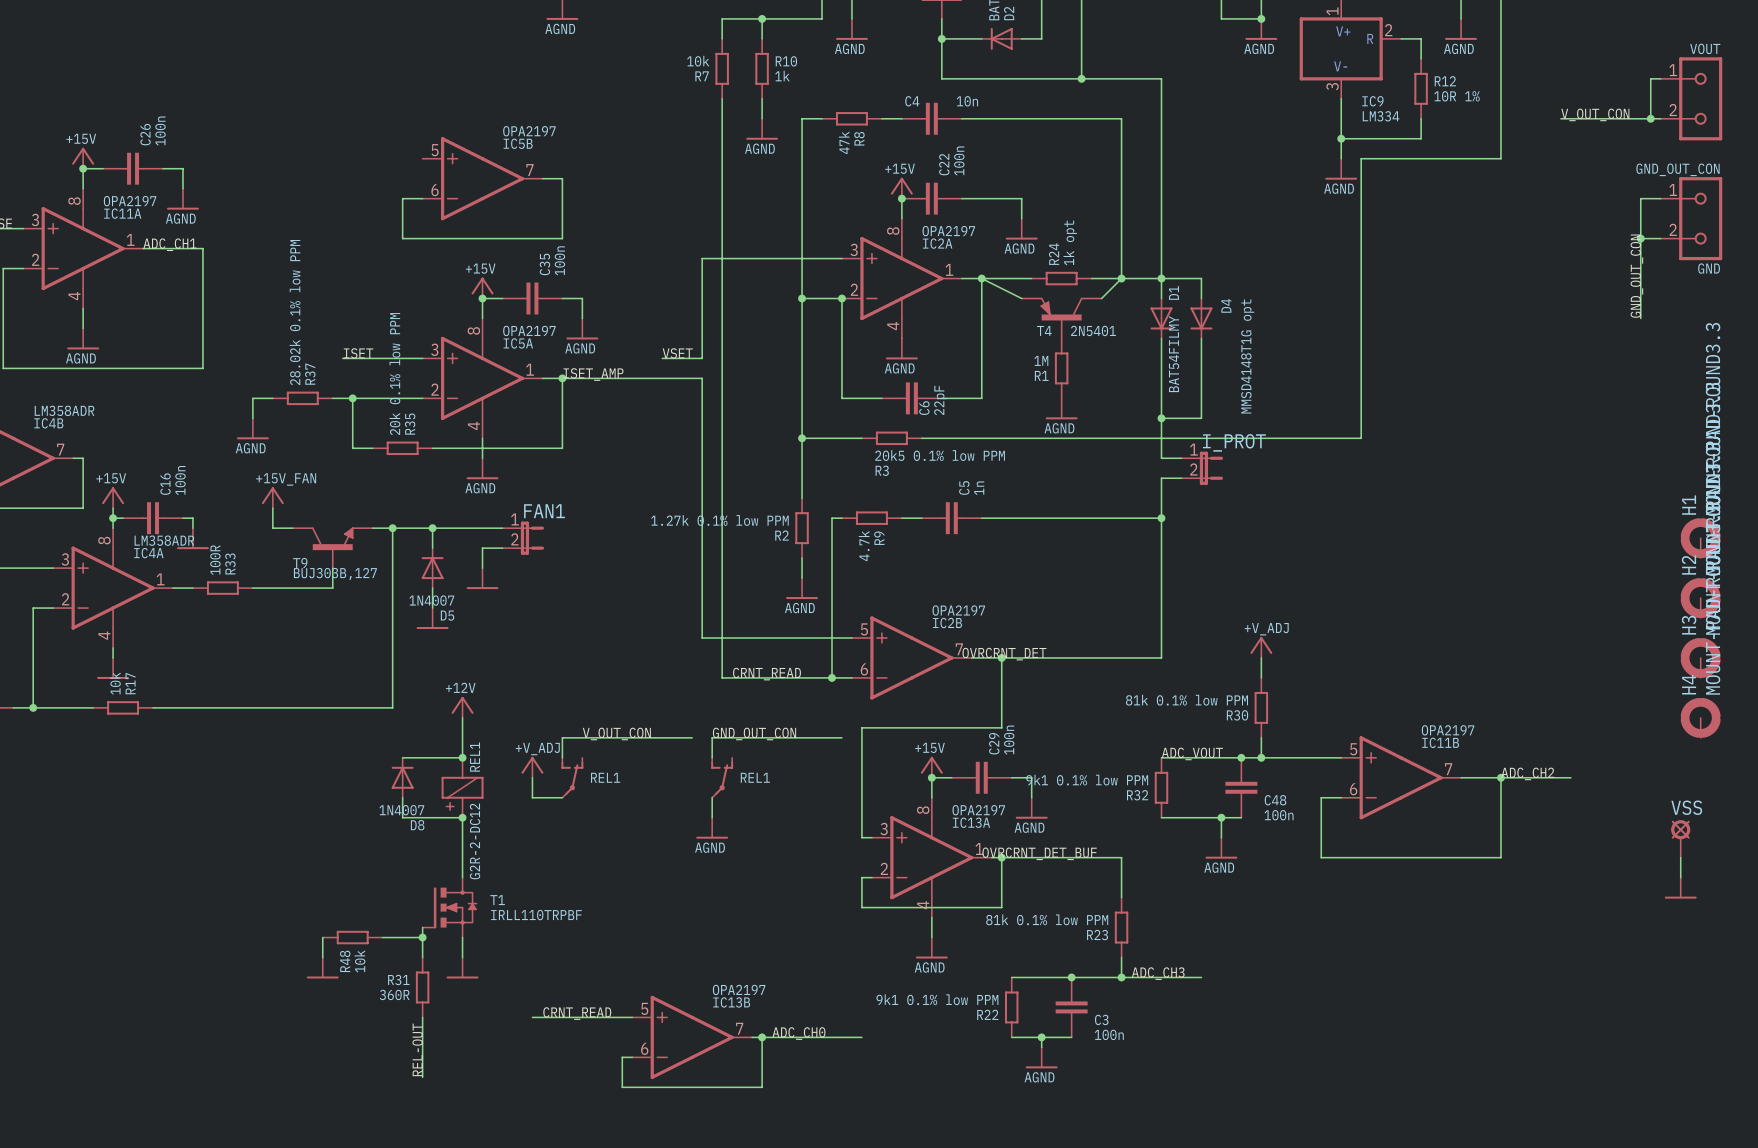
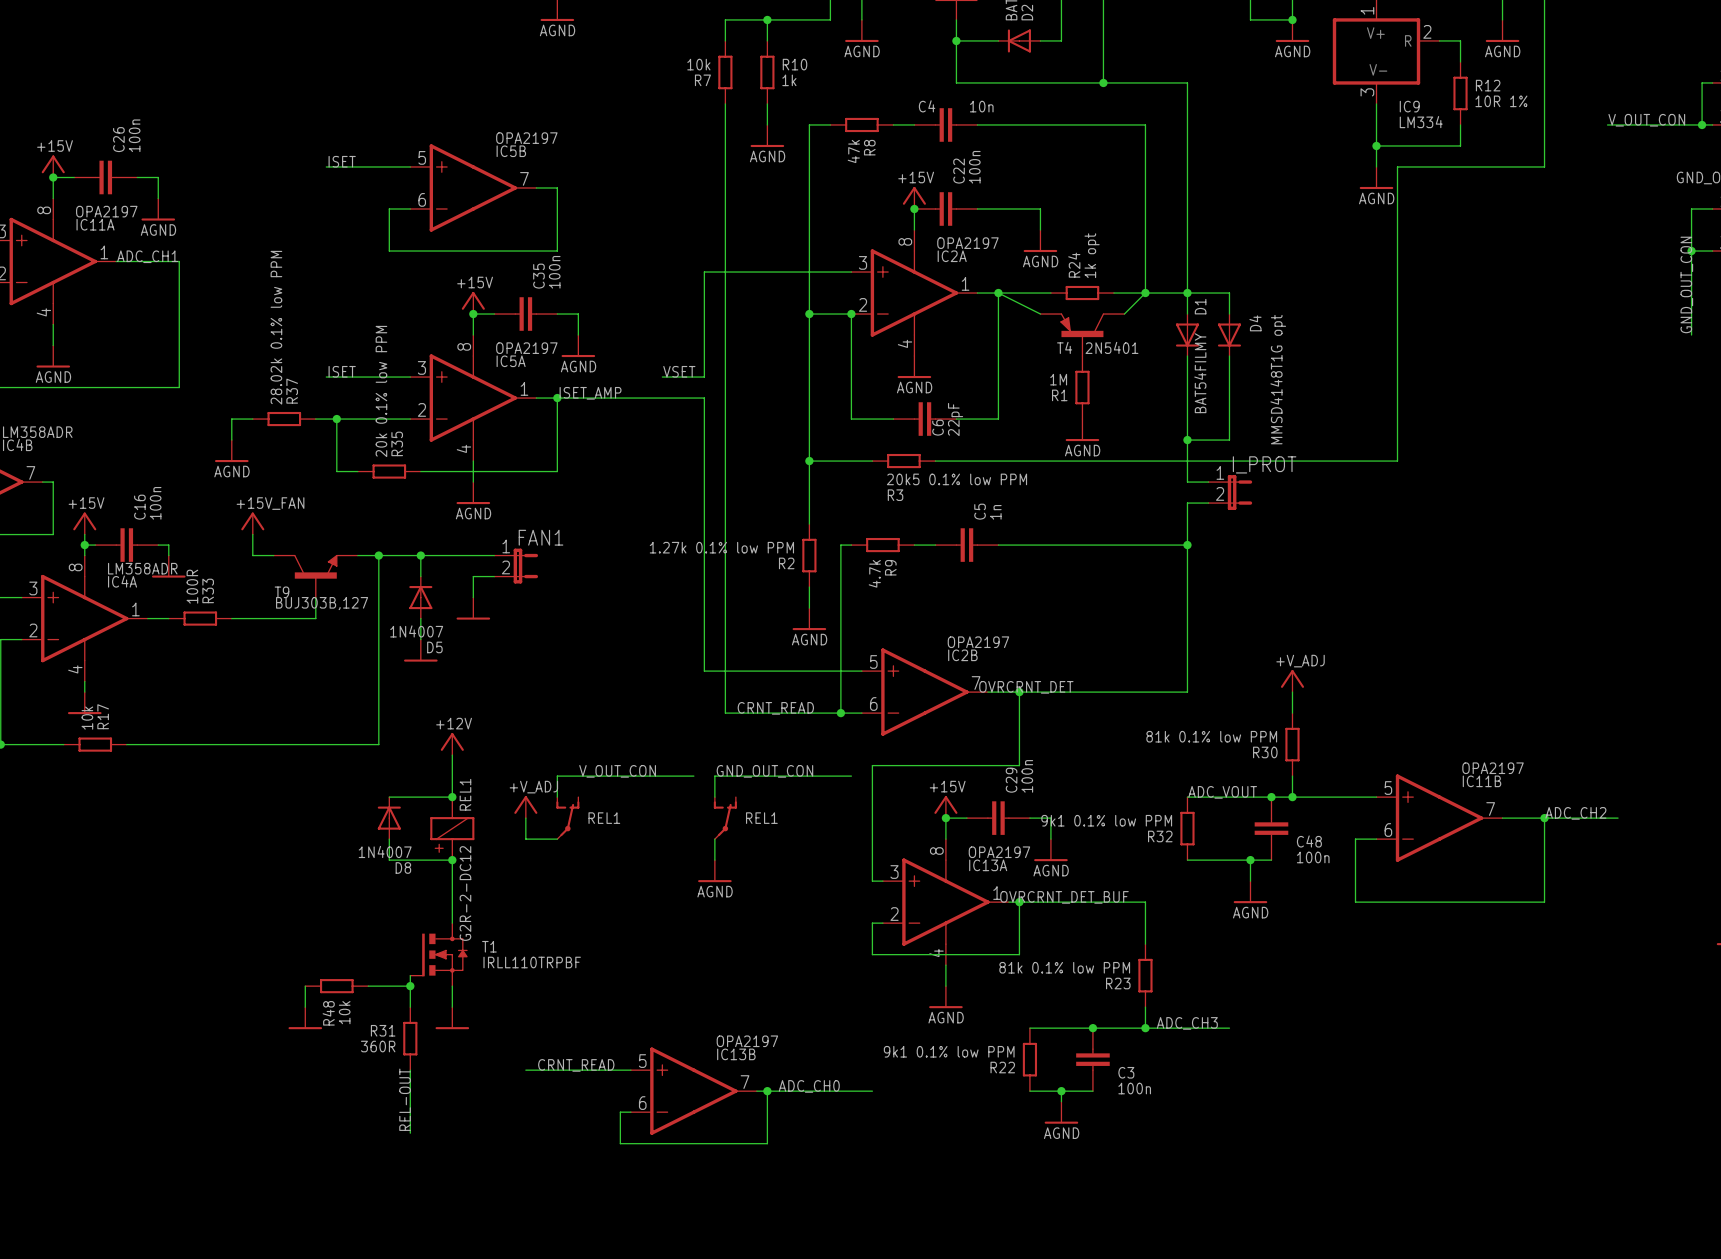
label: none -> ISET (342, 161)
wire: none -> (326, 166) (410, 166)

